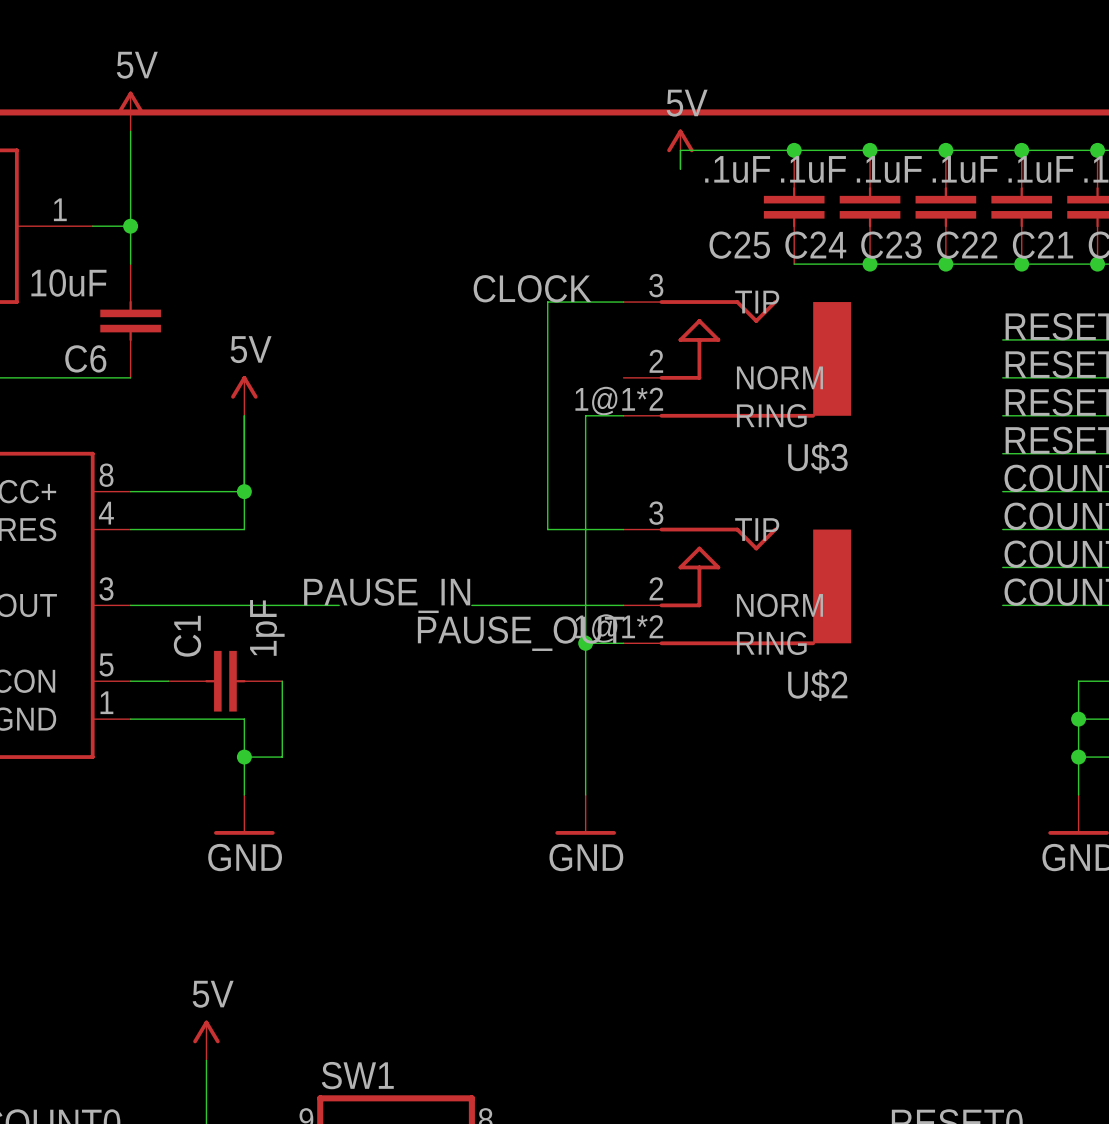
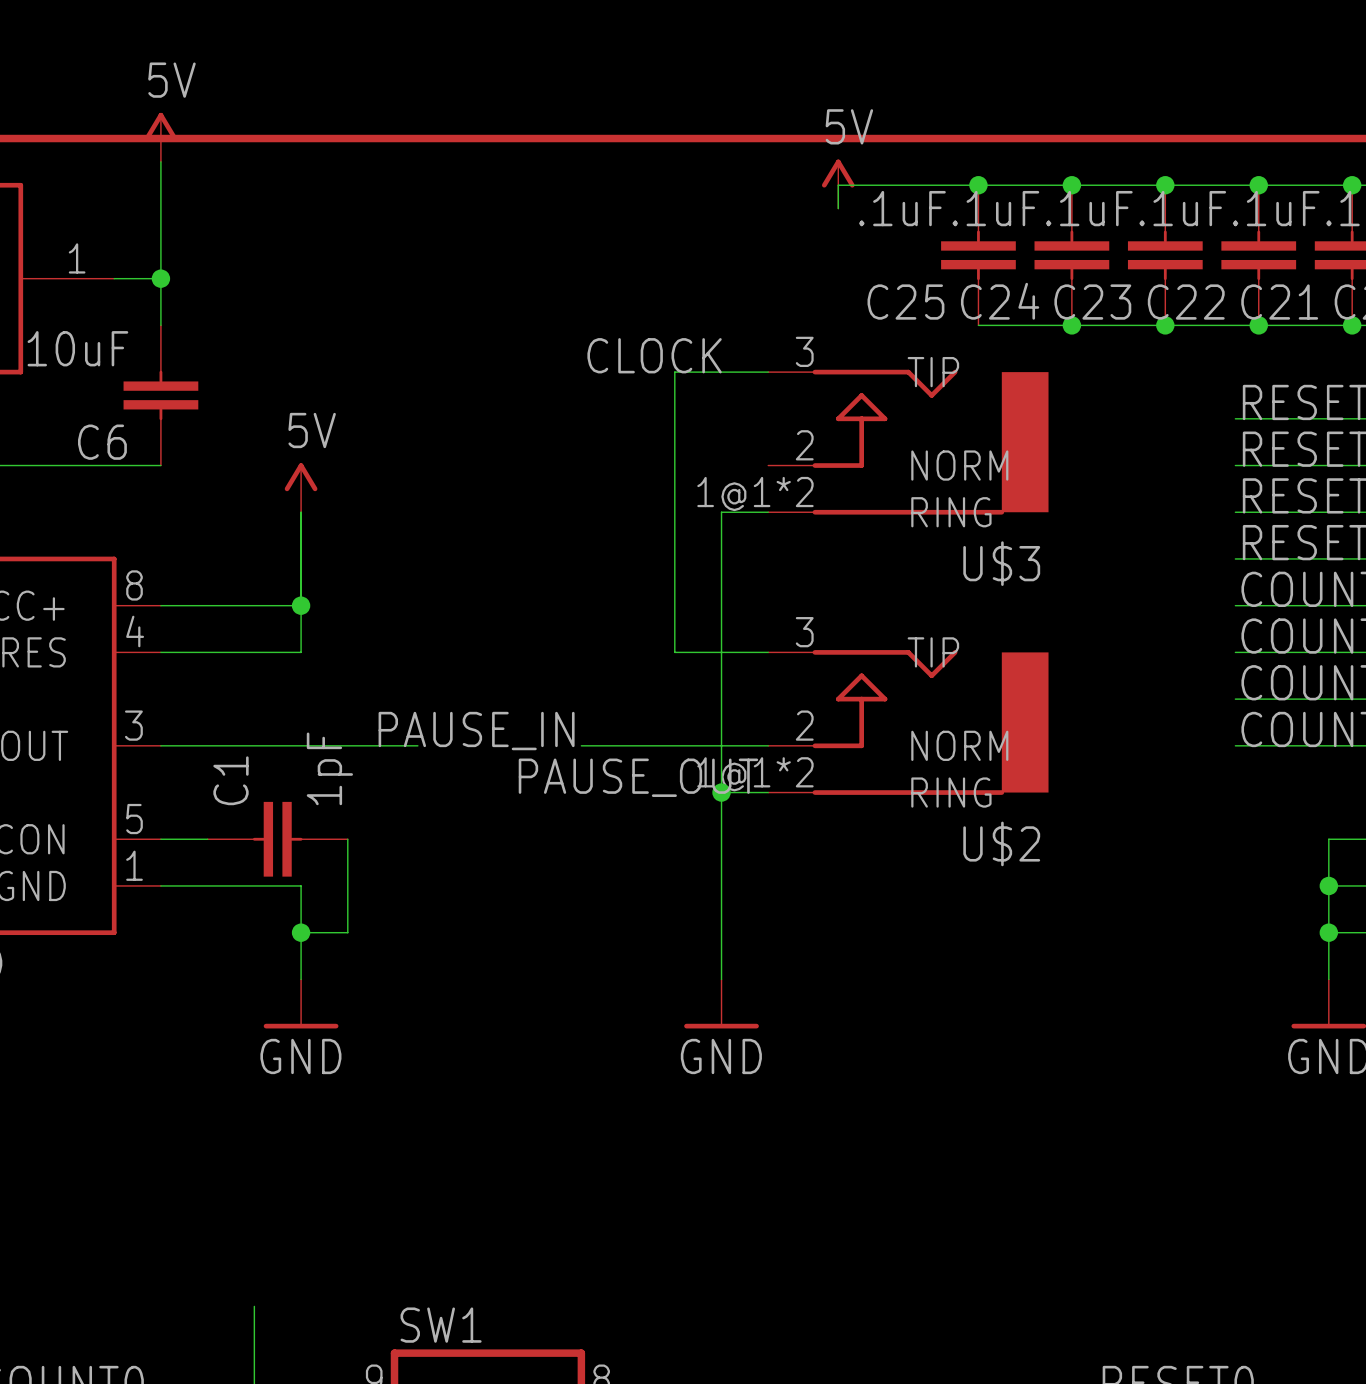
power symbol: 5V (206, 1040) -> none

